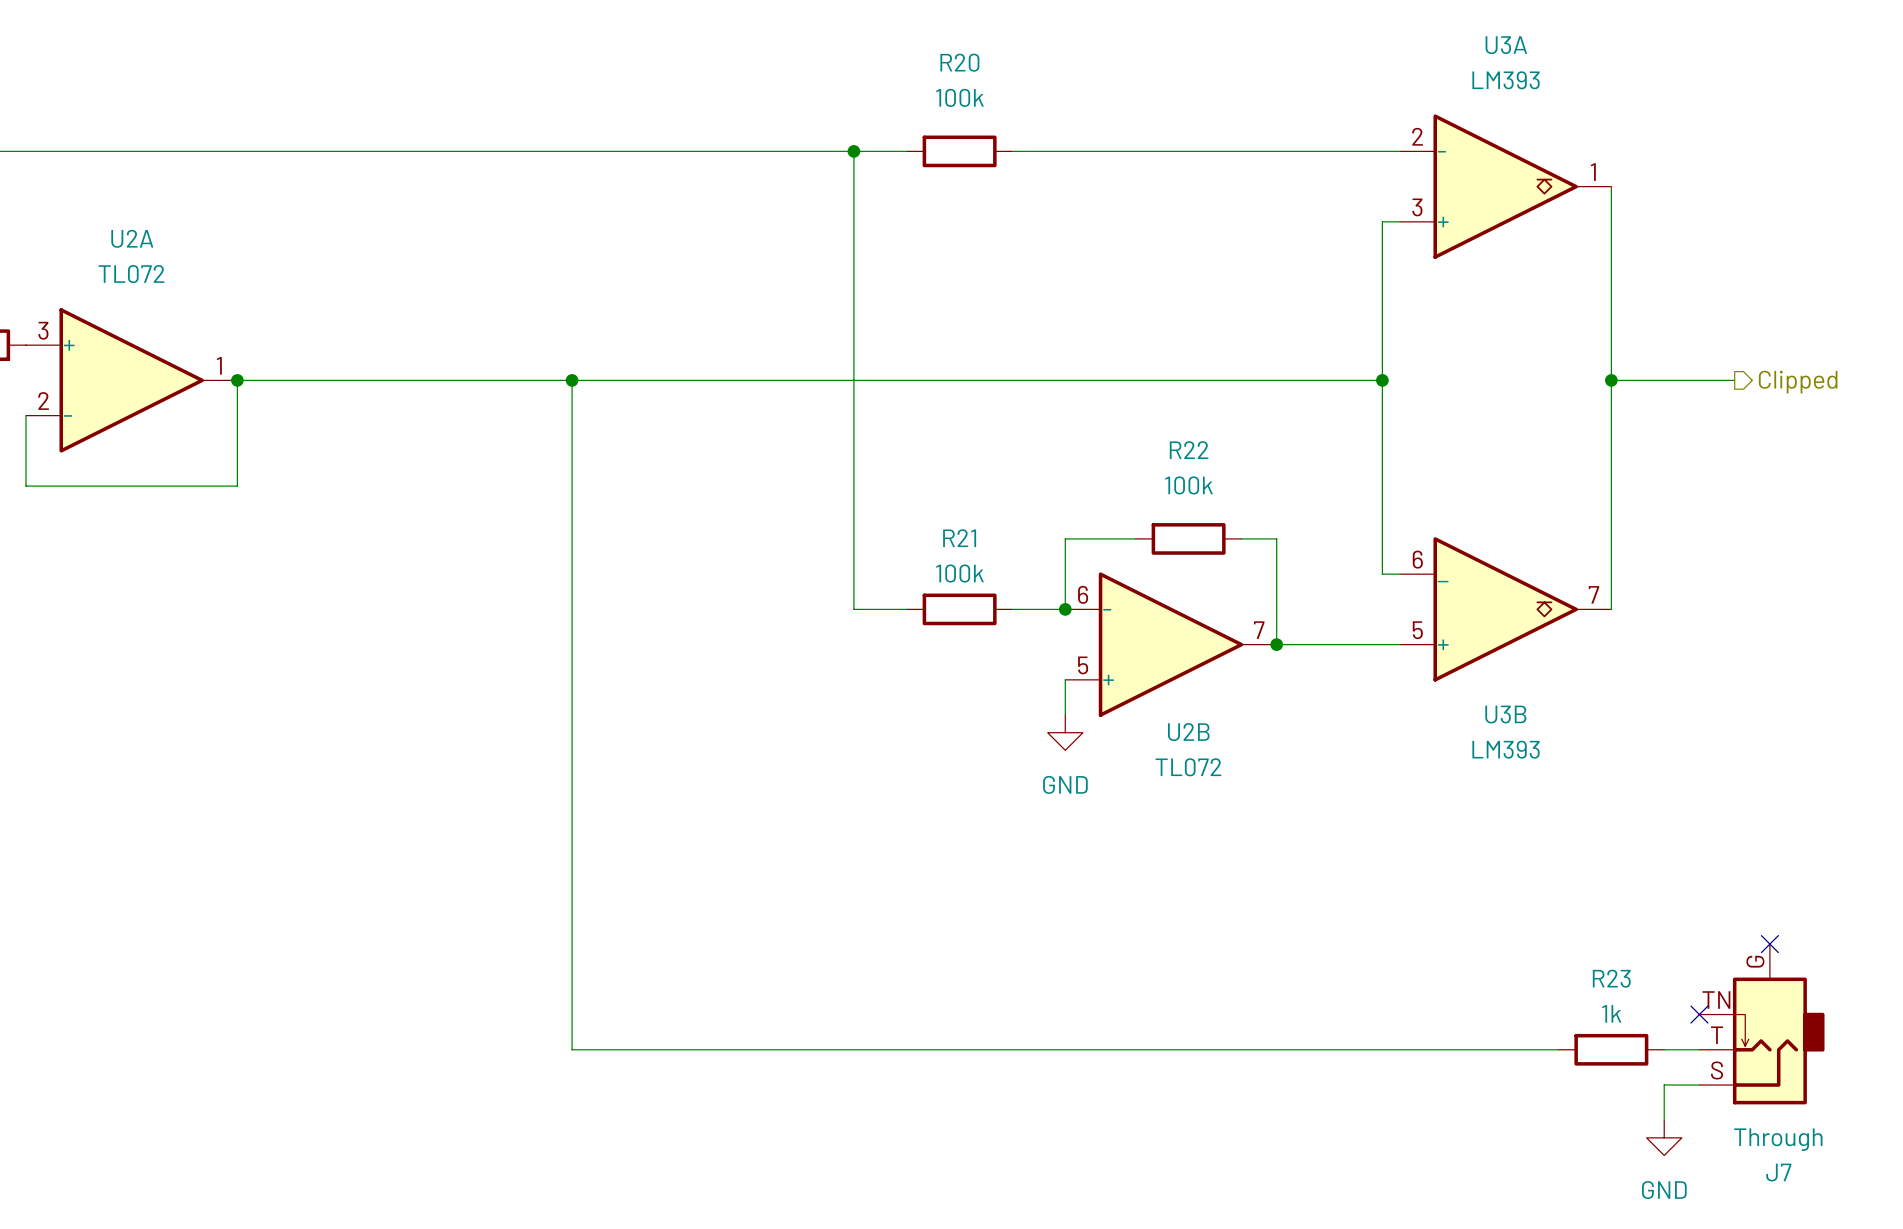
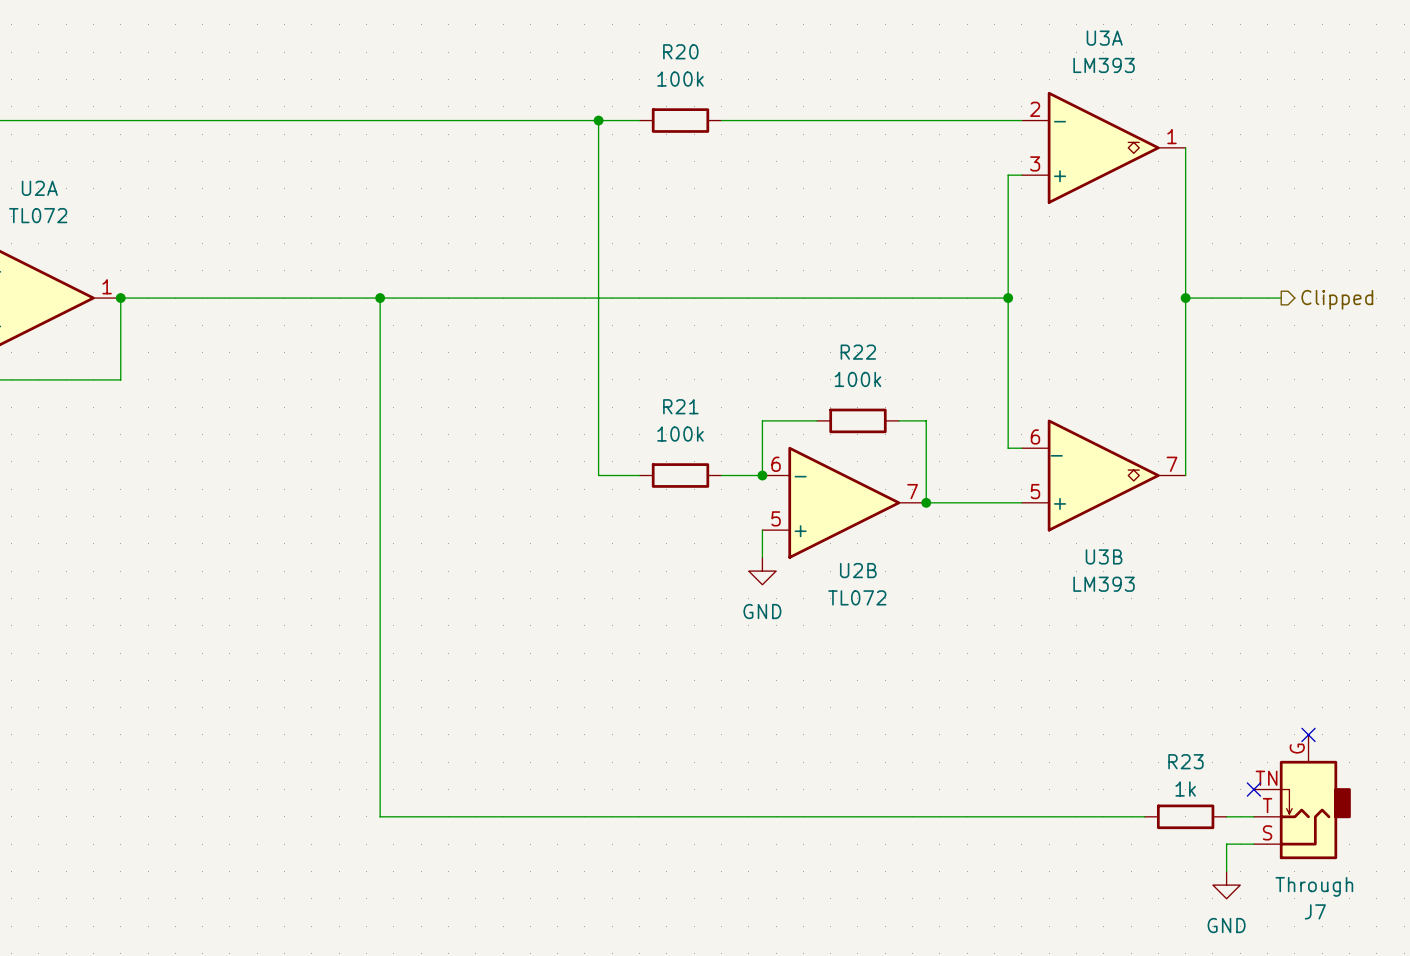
R21 name position: R21 (959, 538) -> R21 (680, 406)
R21 value position: 100k (959, 573) -> 100k (680, 434)

